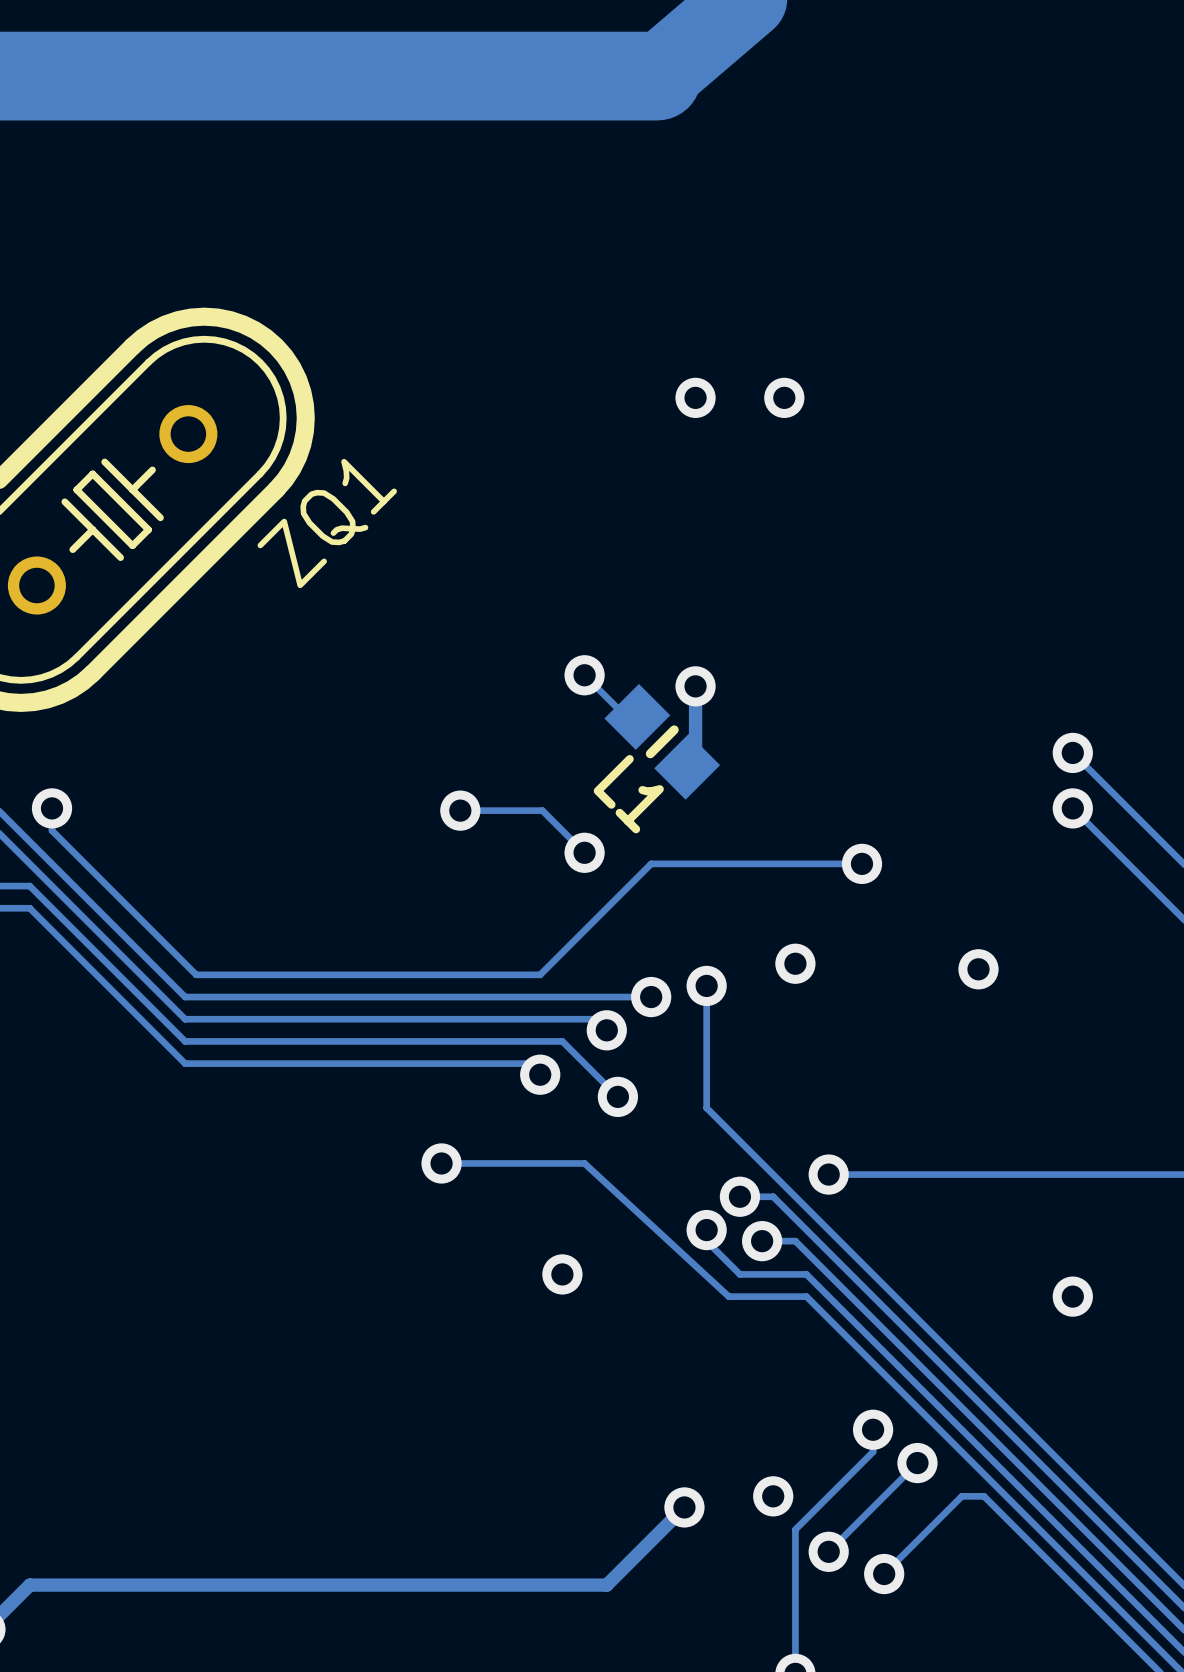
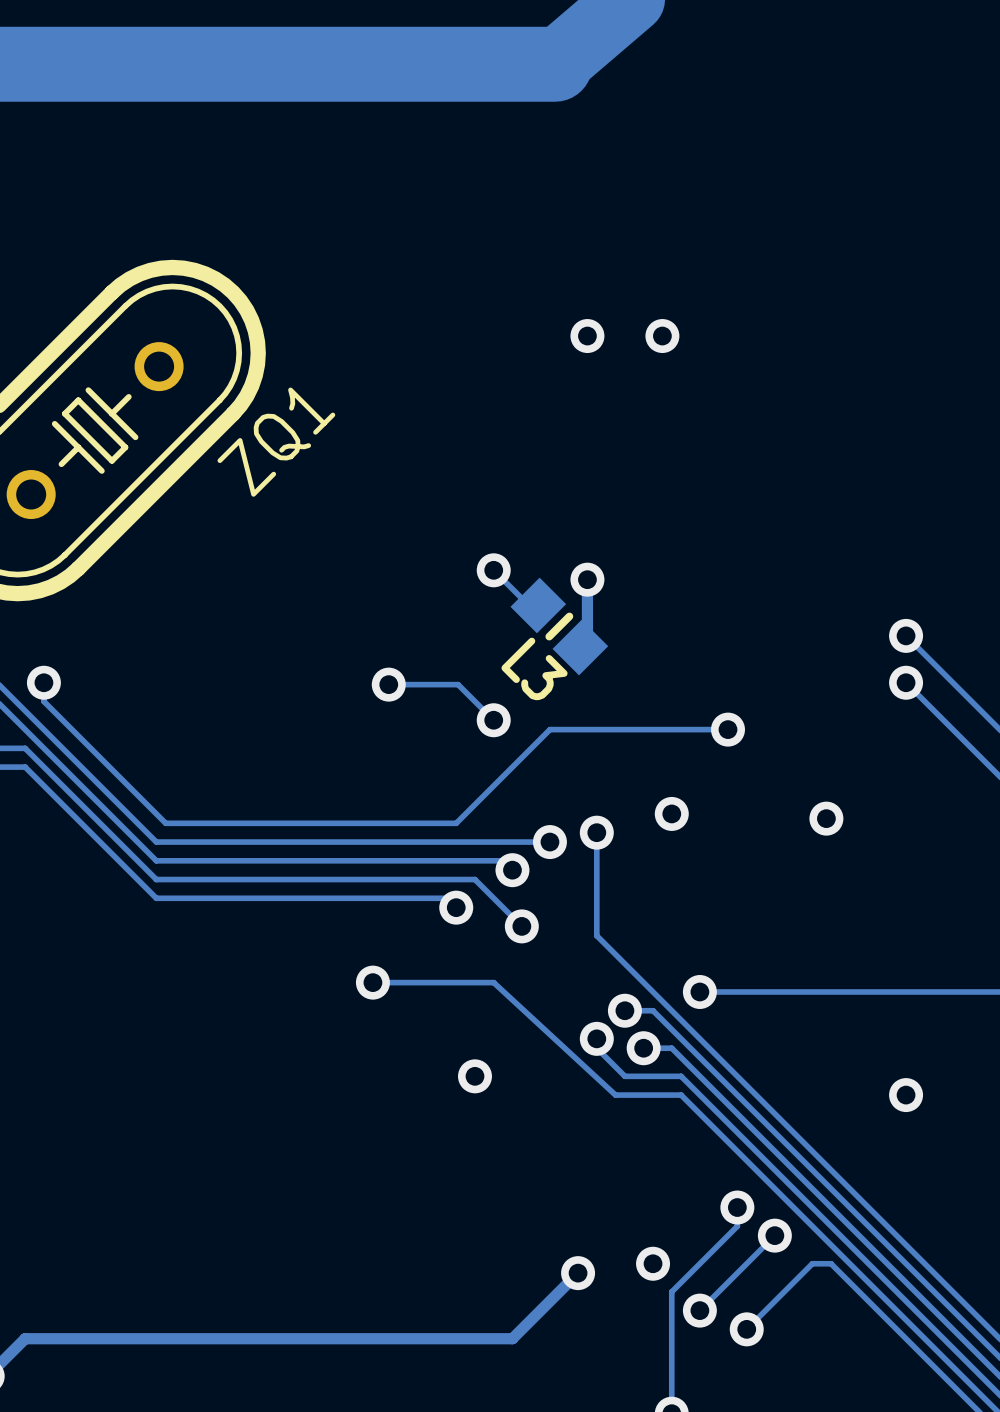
L1 name: L1 (628, 794) -> L3 (534, 668)

